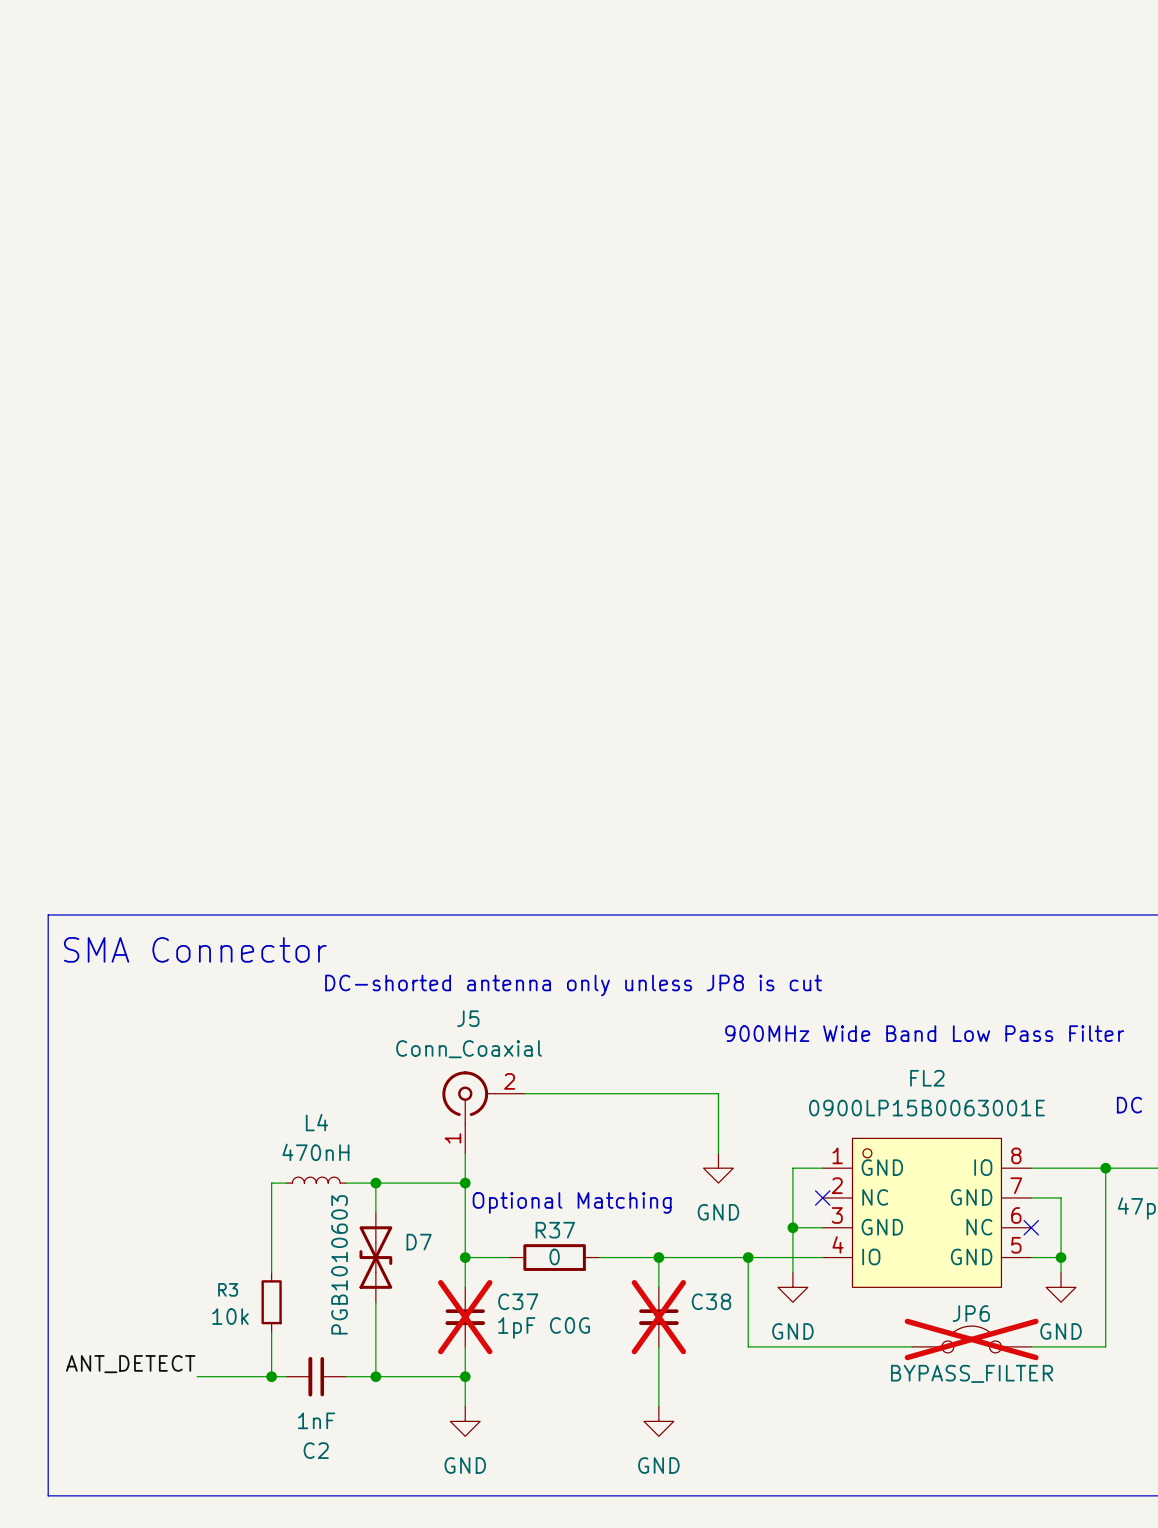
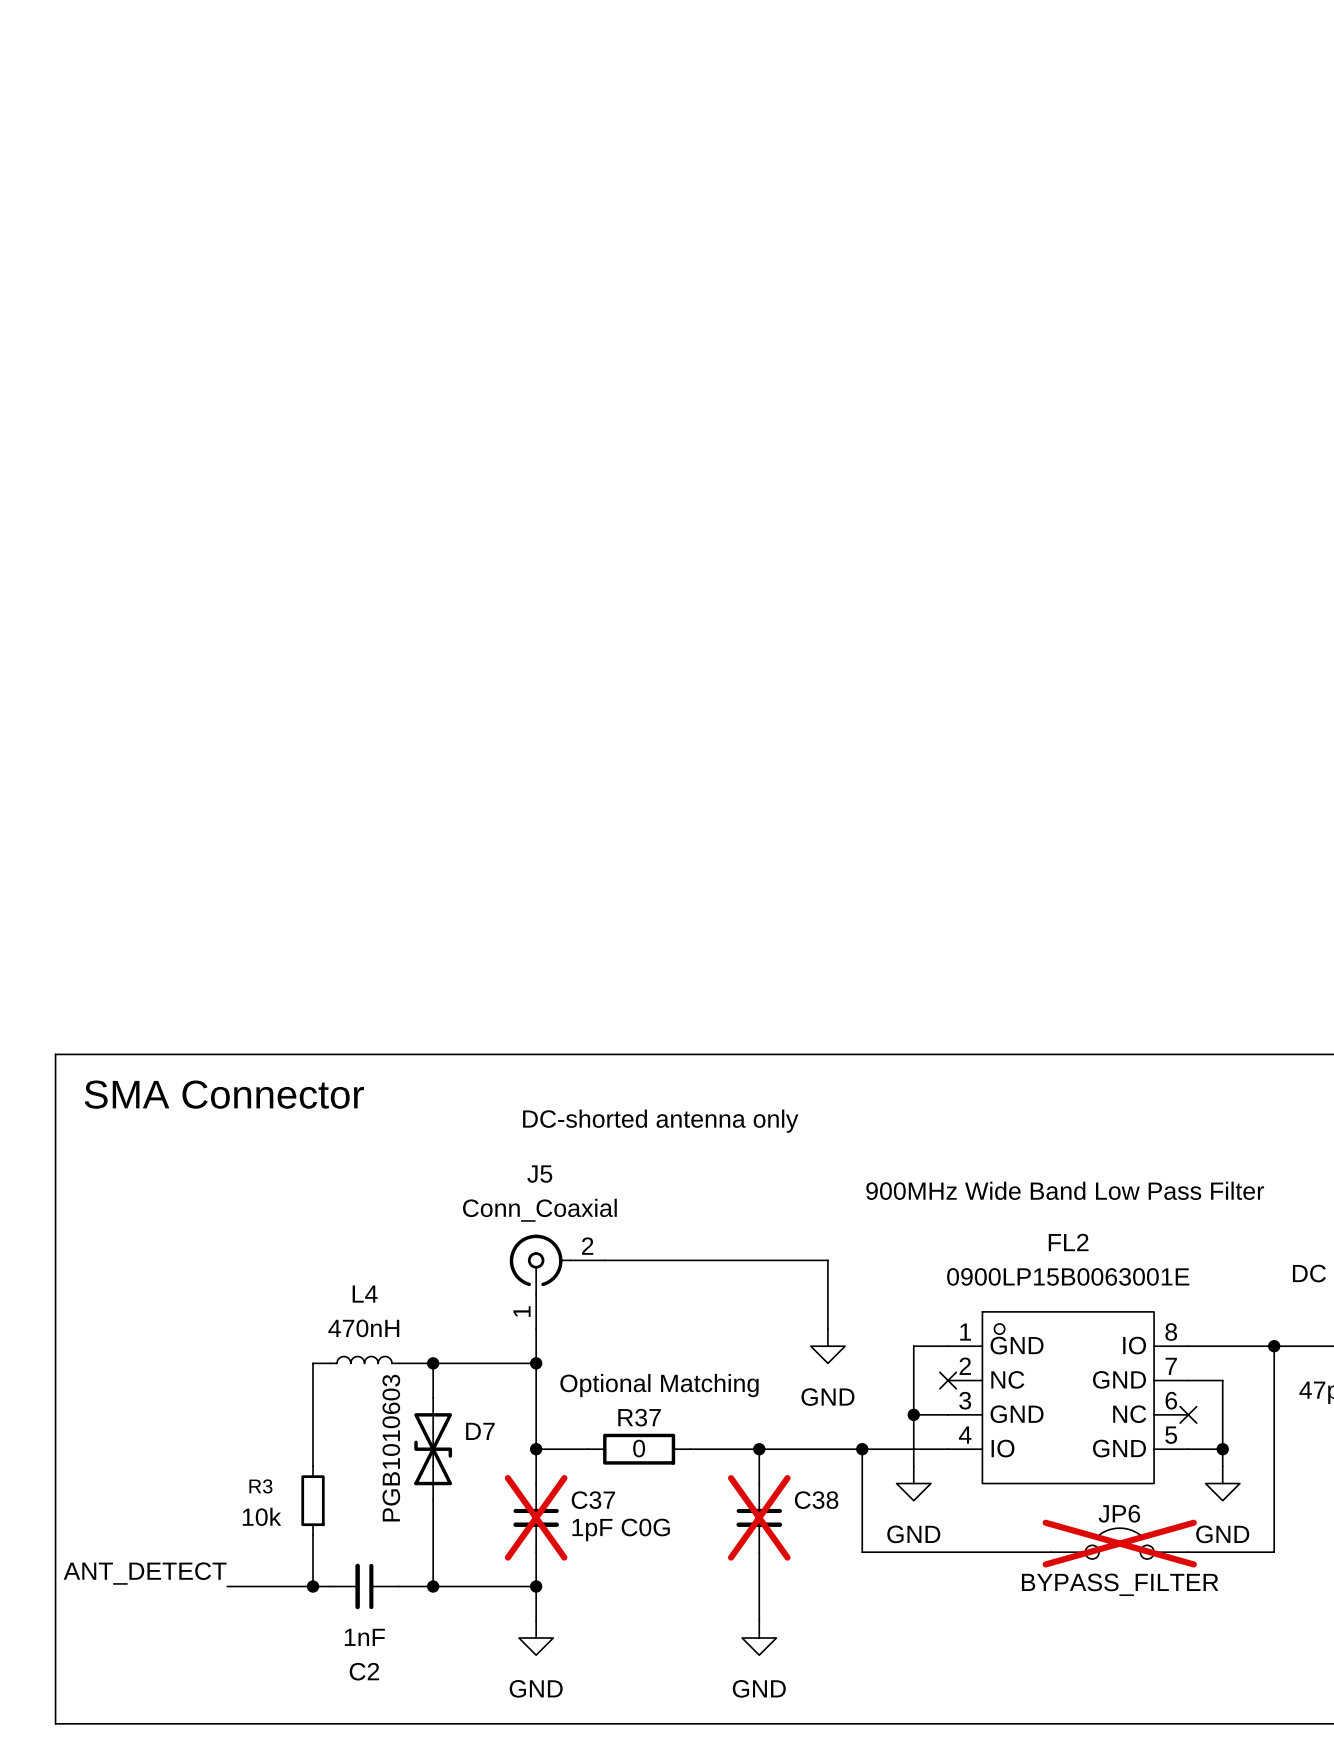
text: DC-shorted antenna only unless JP8 is cut (573, 985) -> DC-shorted antenna only (660, 1121)

